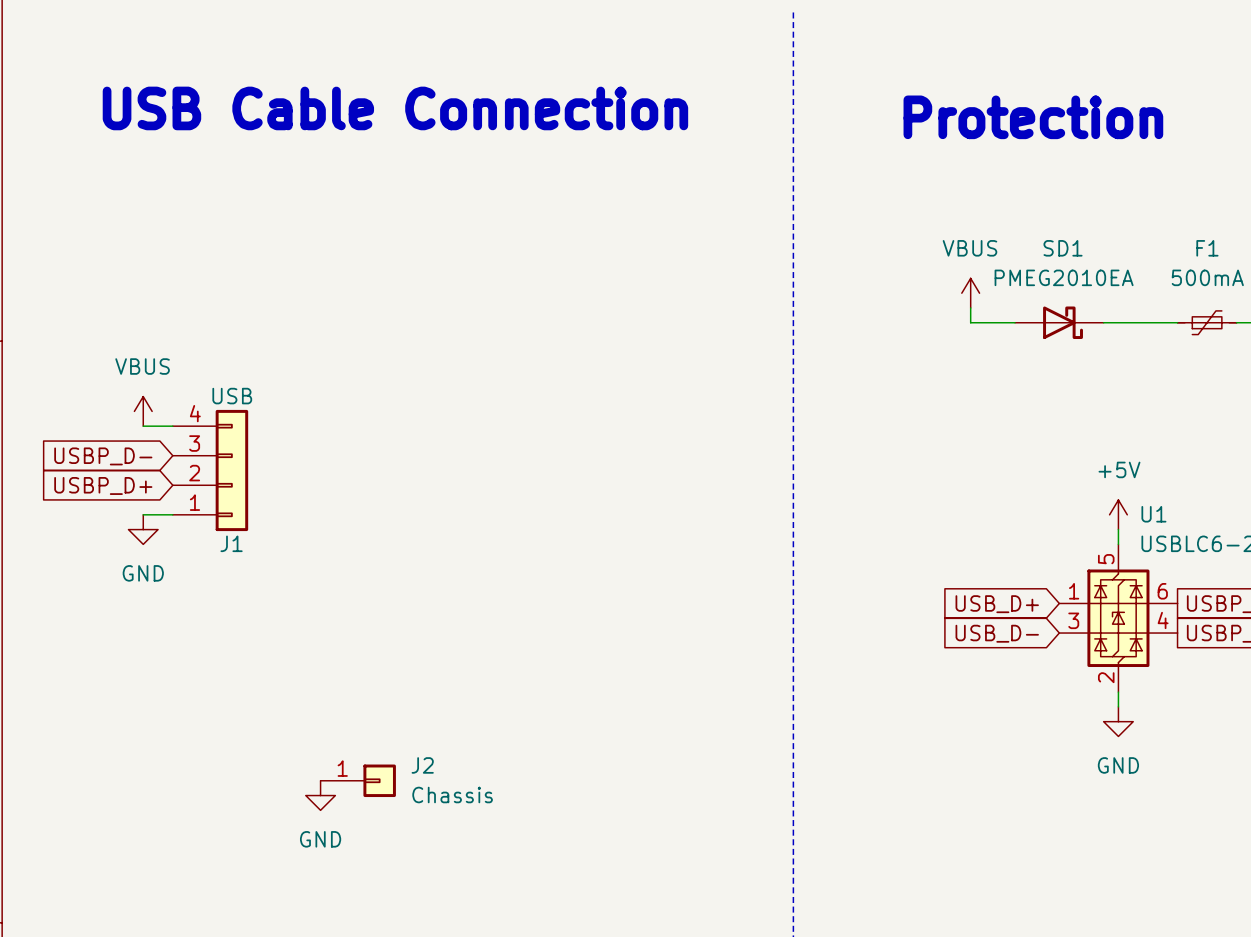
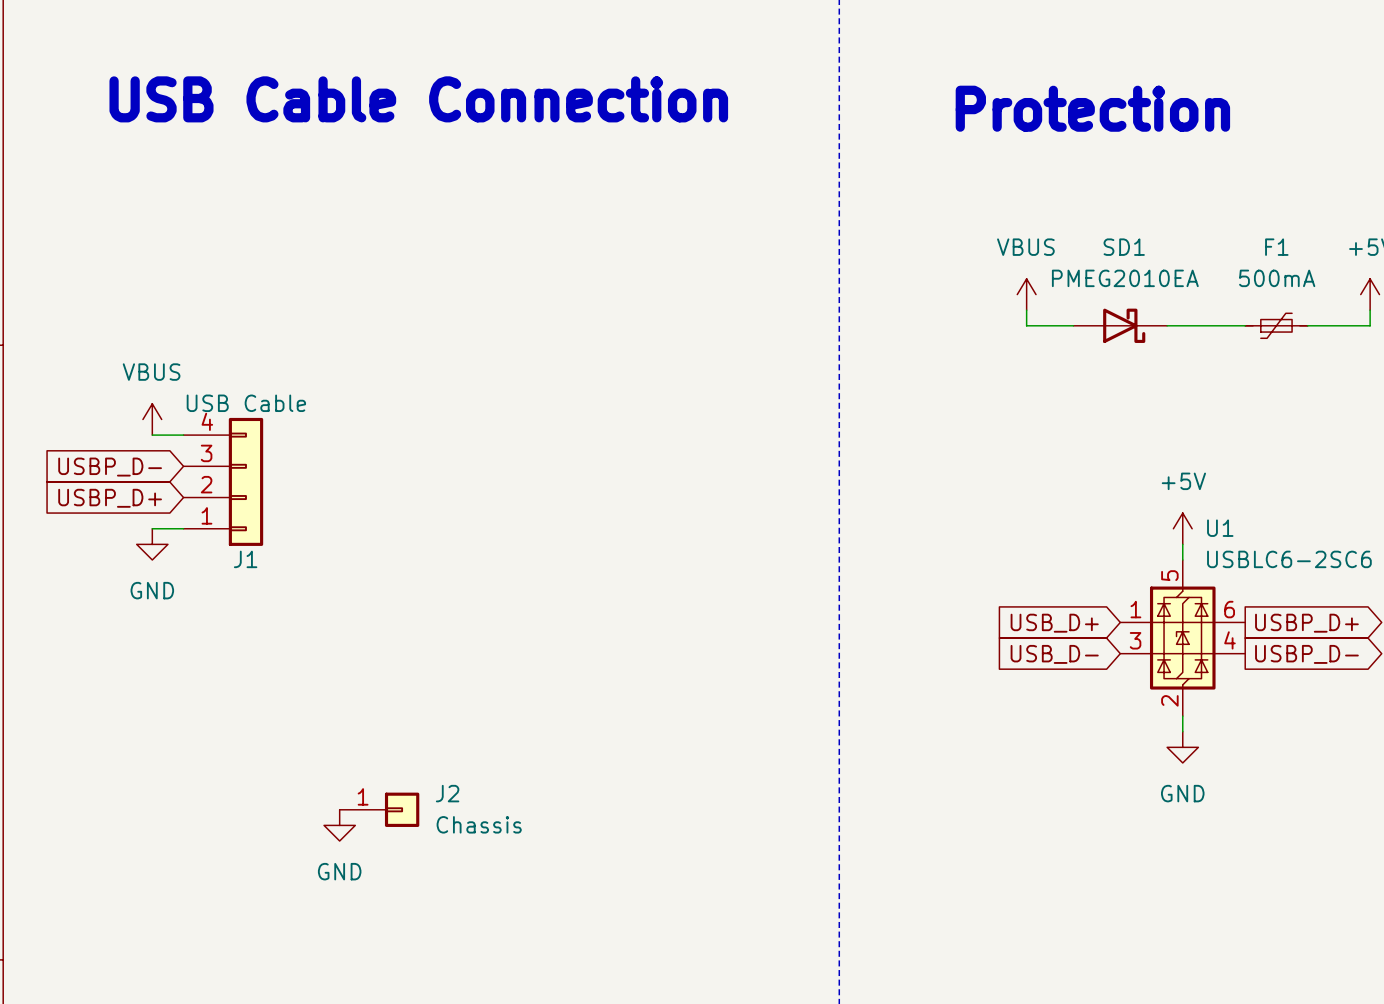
J1 value: USB (232, 396) -> USB Cable (246, 403)

